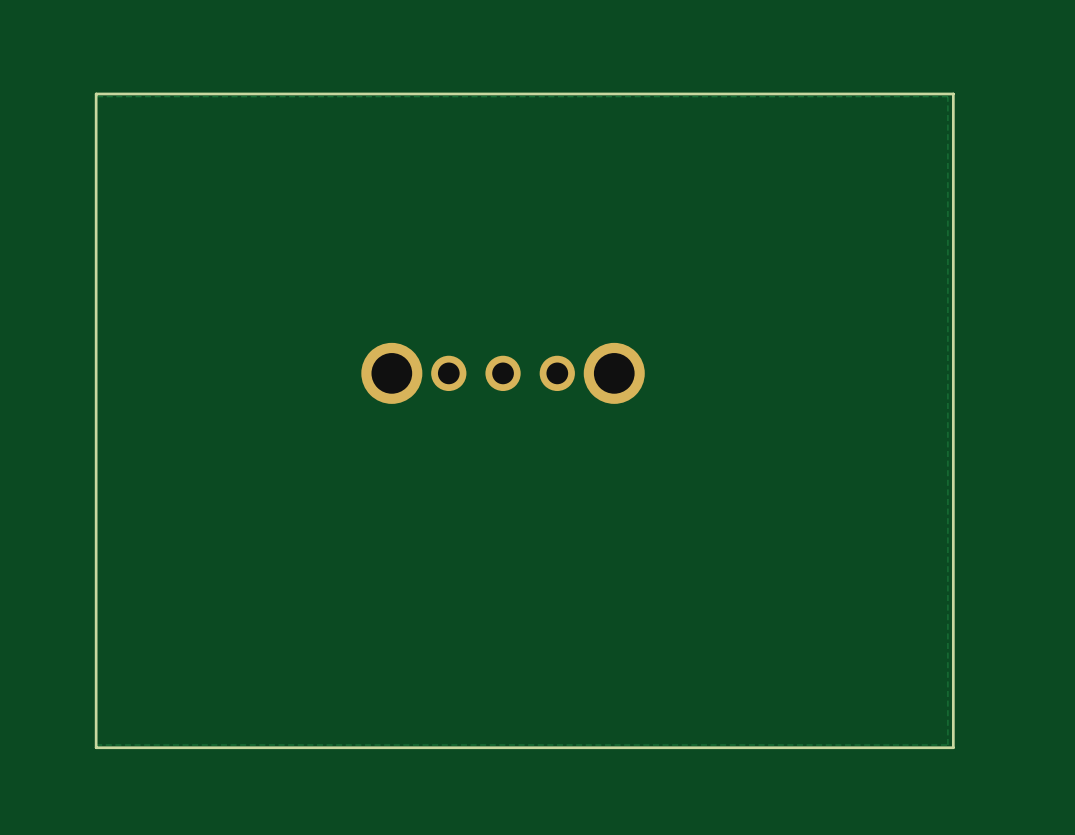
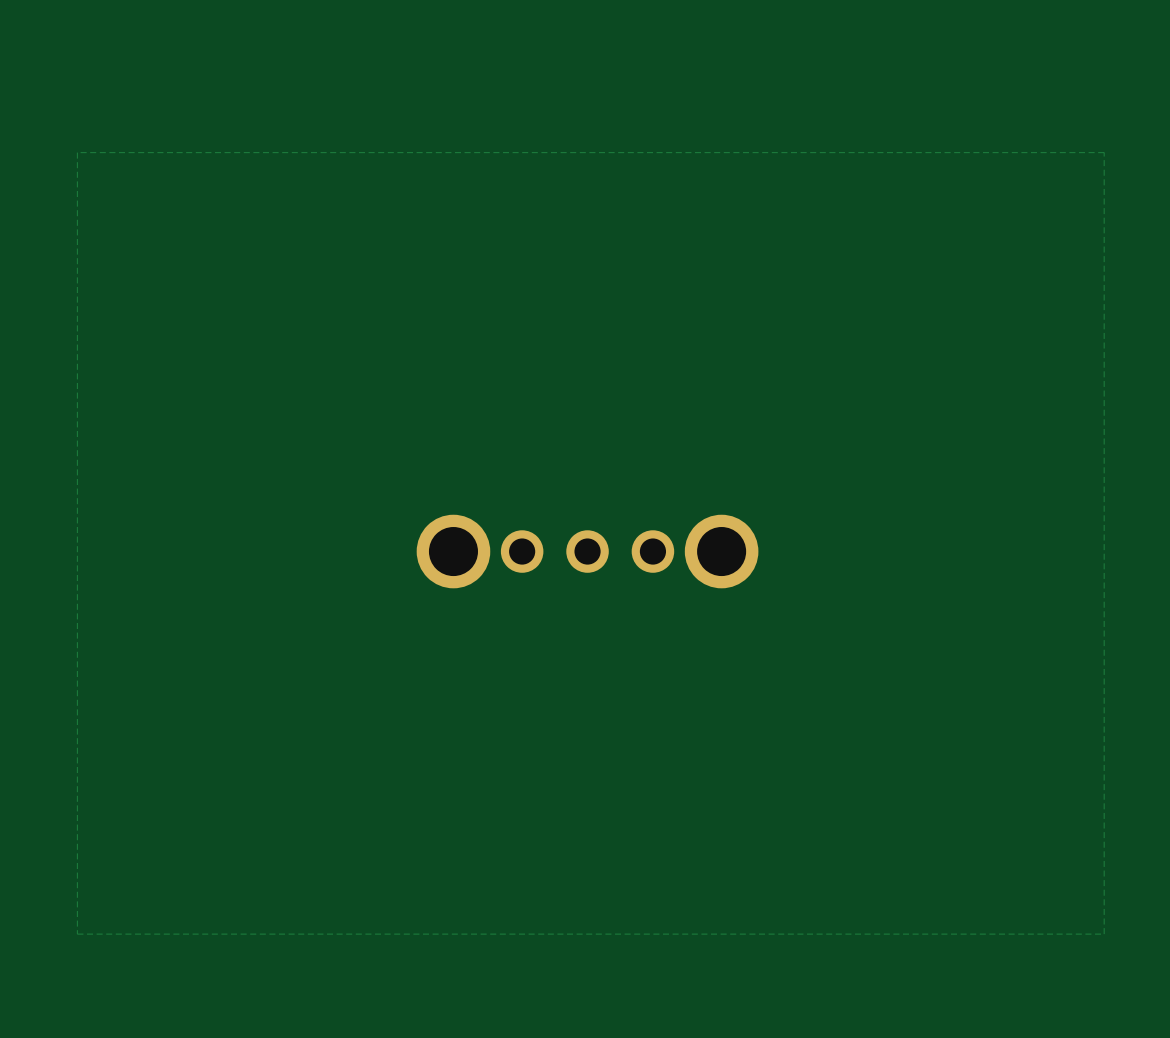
board edge: (953, 93) (96, 93) (96, 747) (953, 747) (953, 93) -> none
part position: (503, 373) -> (587, 551)

